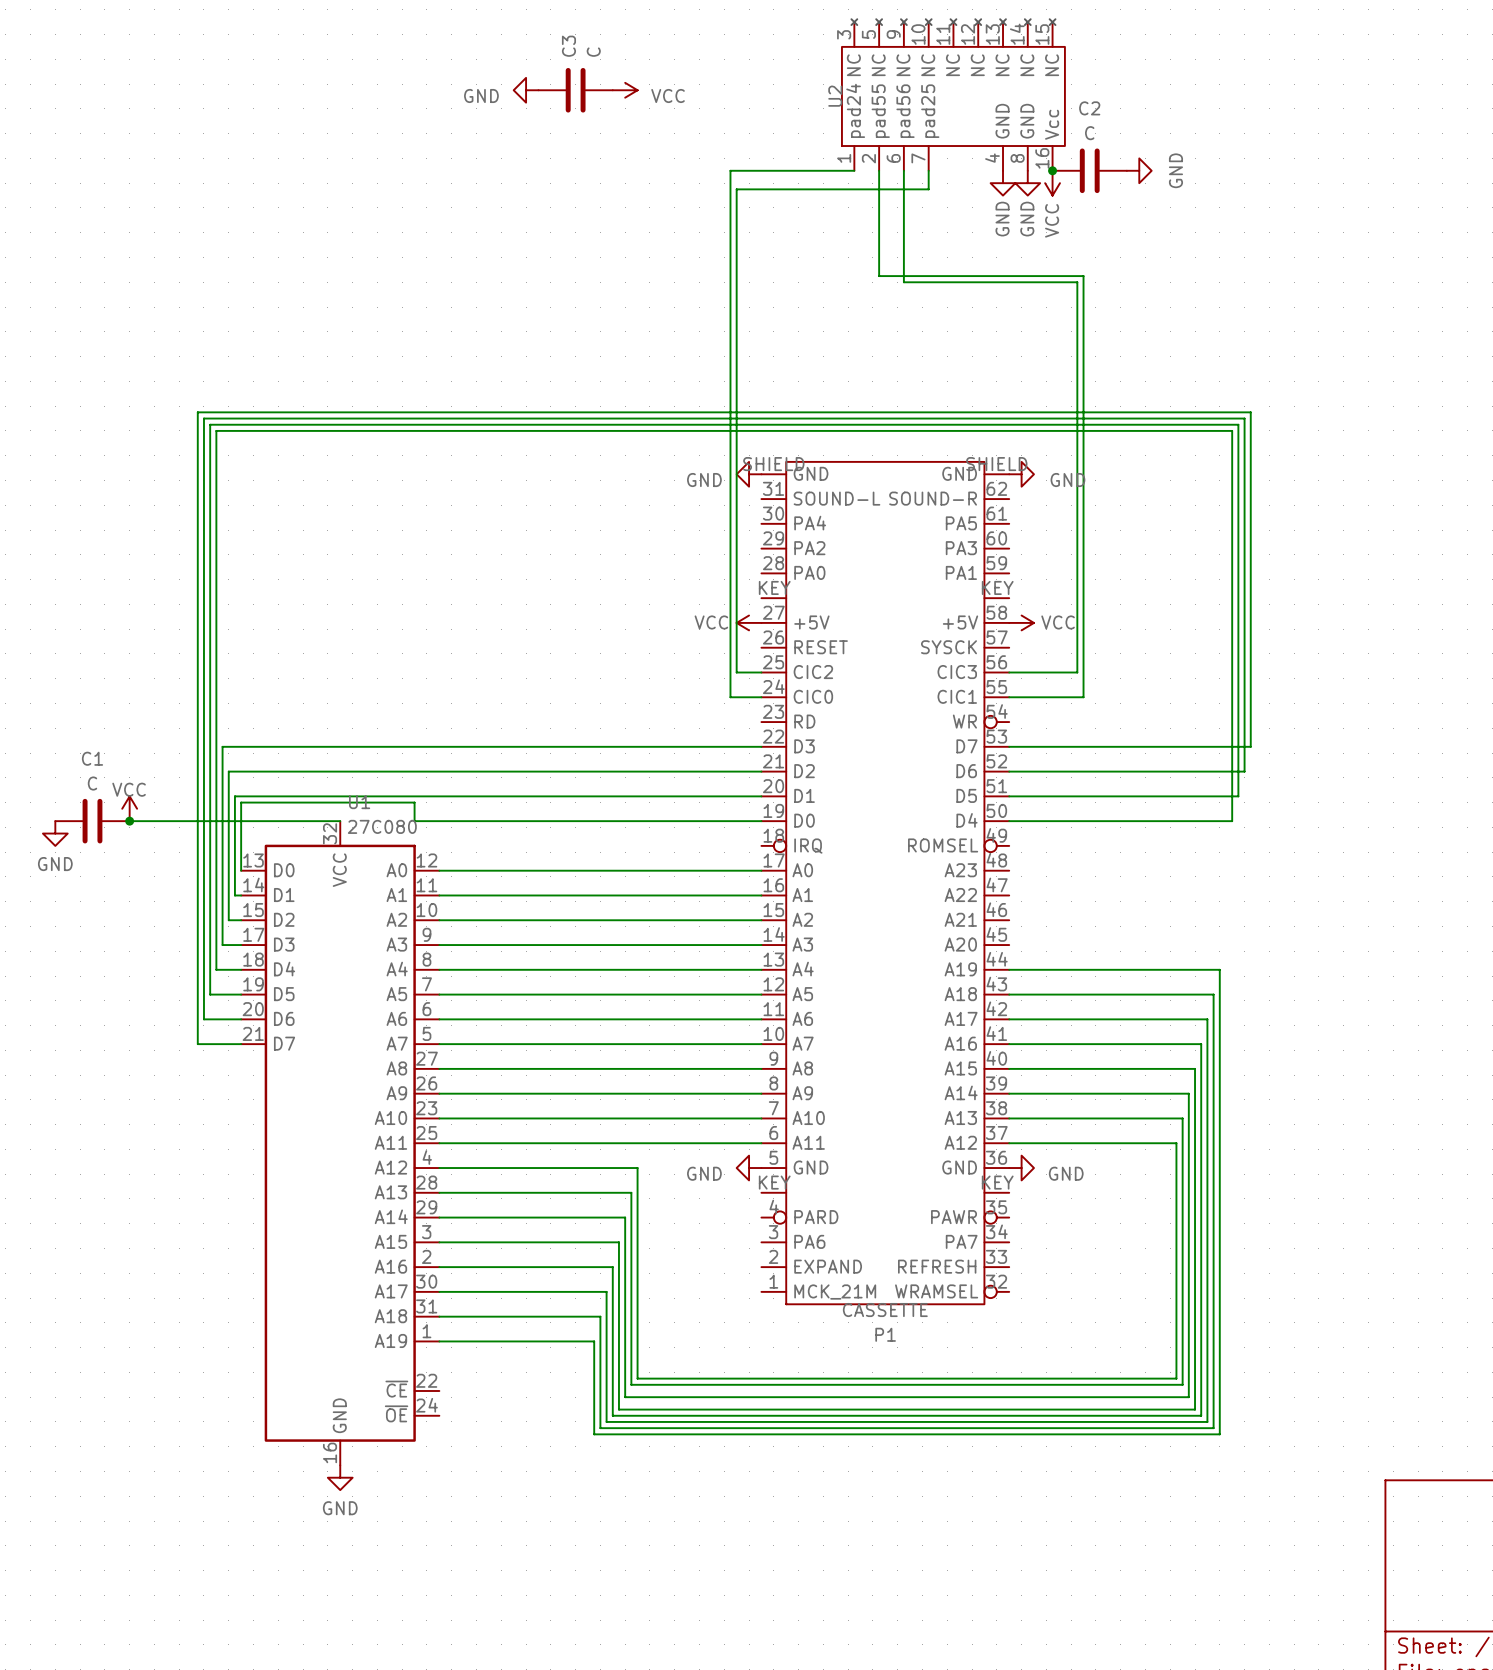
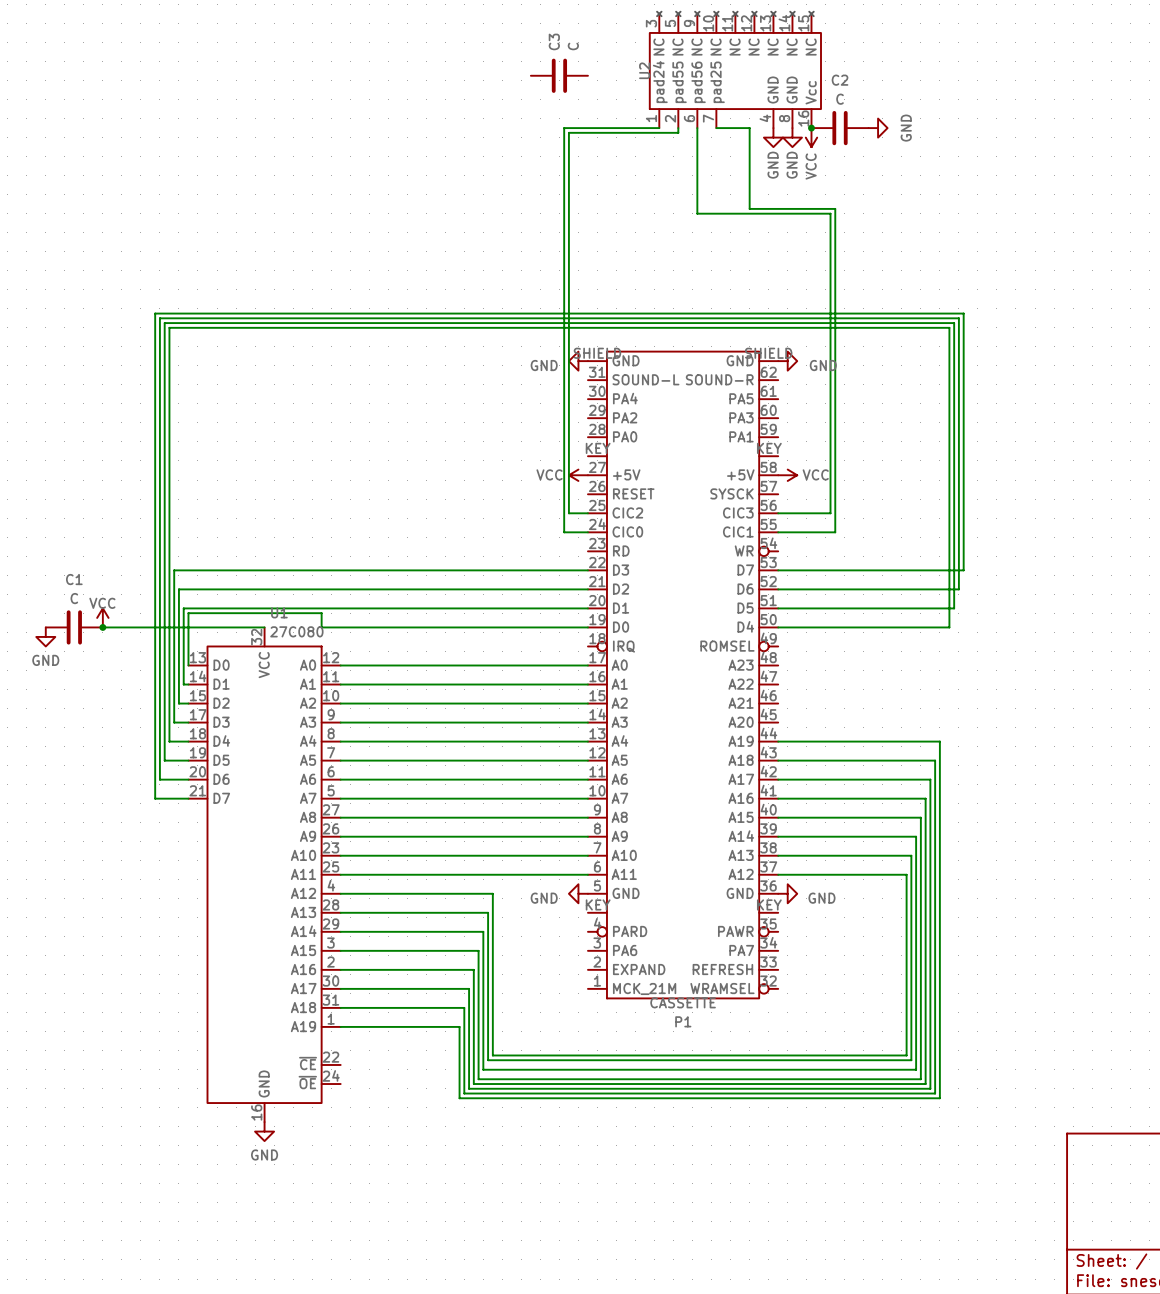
power symbol: GND (526, 90) -> none
C3 position: (575, 90) -> (559, 75)
power symbol: VCC (625, 90) -> none
wire: (928, 170) (928, 189) (736, 189) -> (678, 132) (568, 132) (568, 142)
wire: (879, 176) (879, 276) (972, 276) -> (716, 128) (749, 128) (749, 208)

